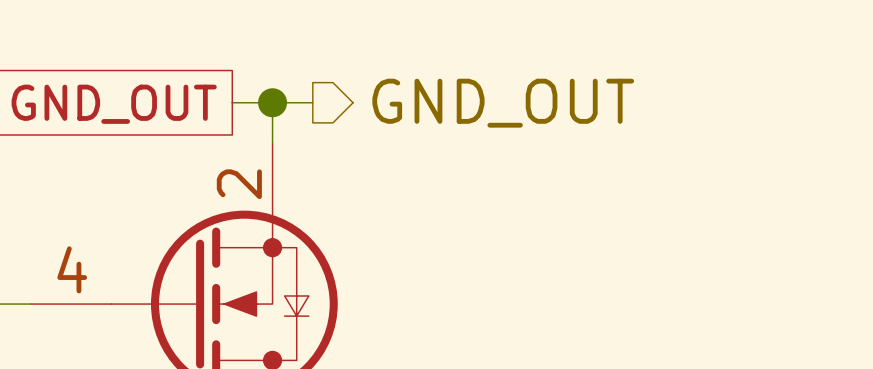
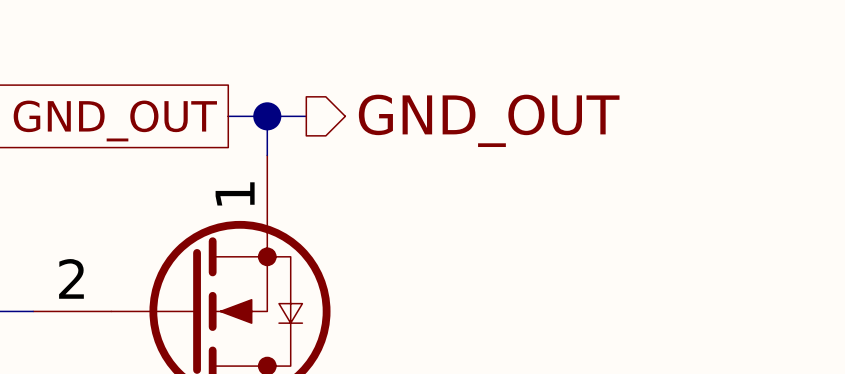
part pin number: 2 (239, 184) -> 1 (235, 193)
part pin number: 4 (72, 269) -> 2 (71, 278)

